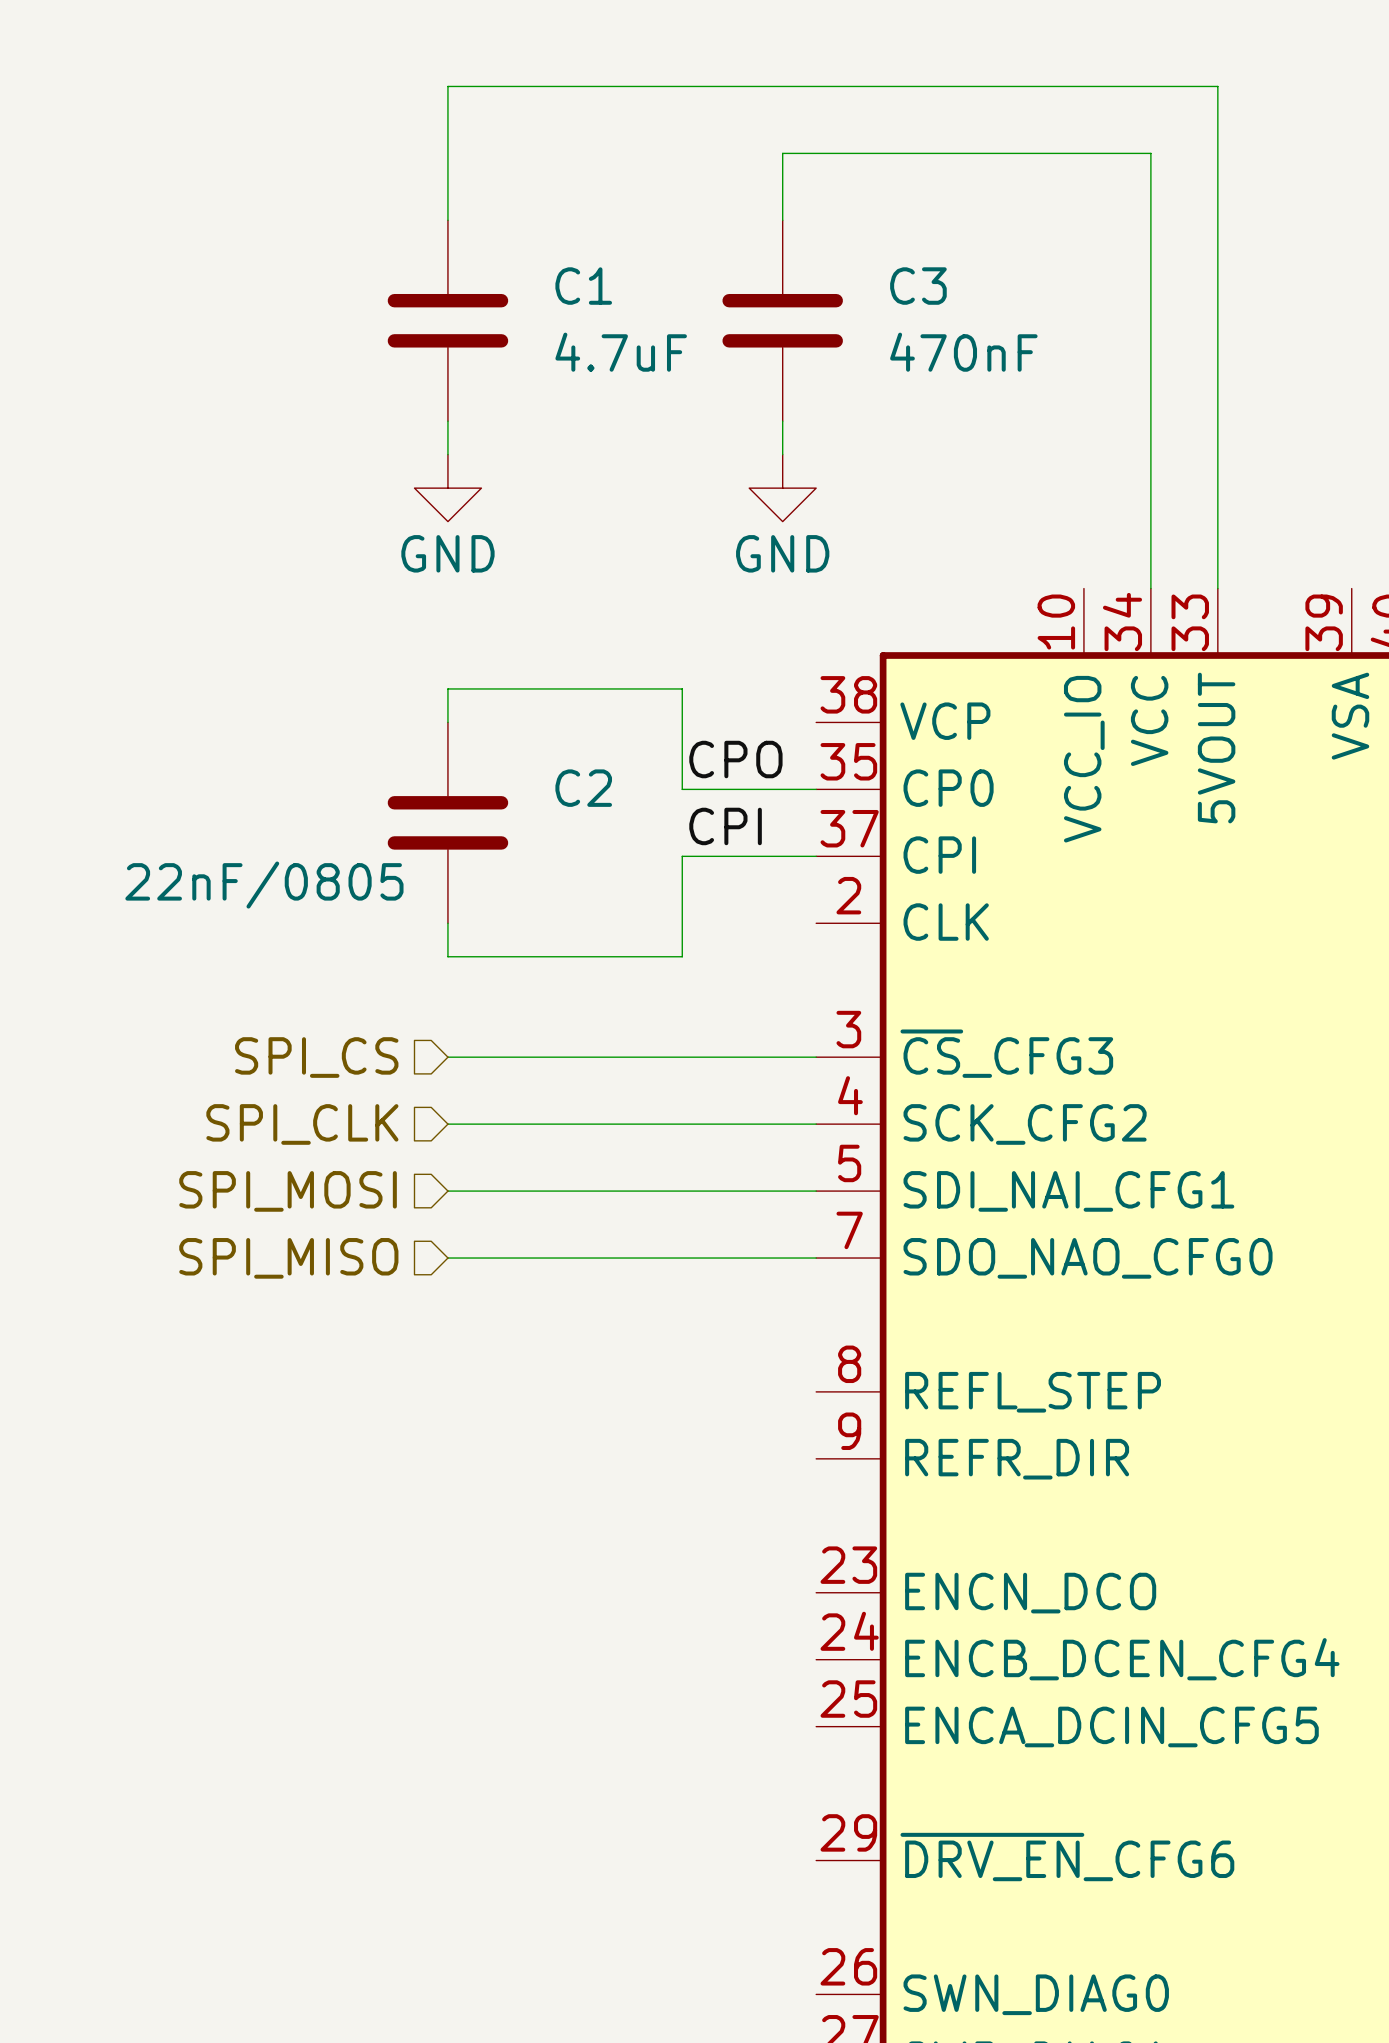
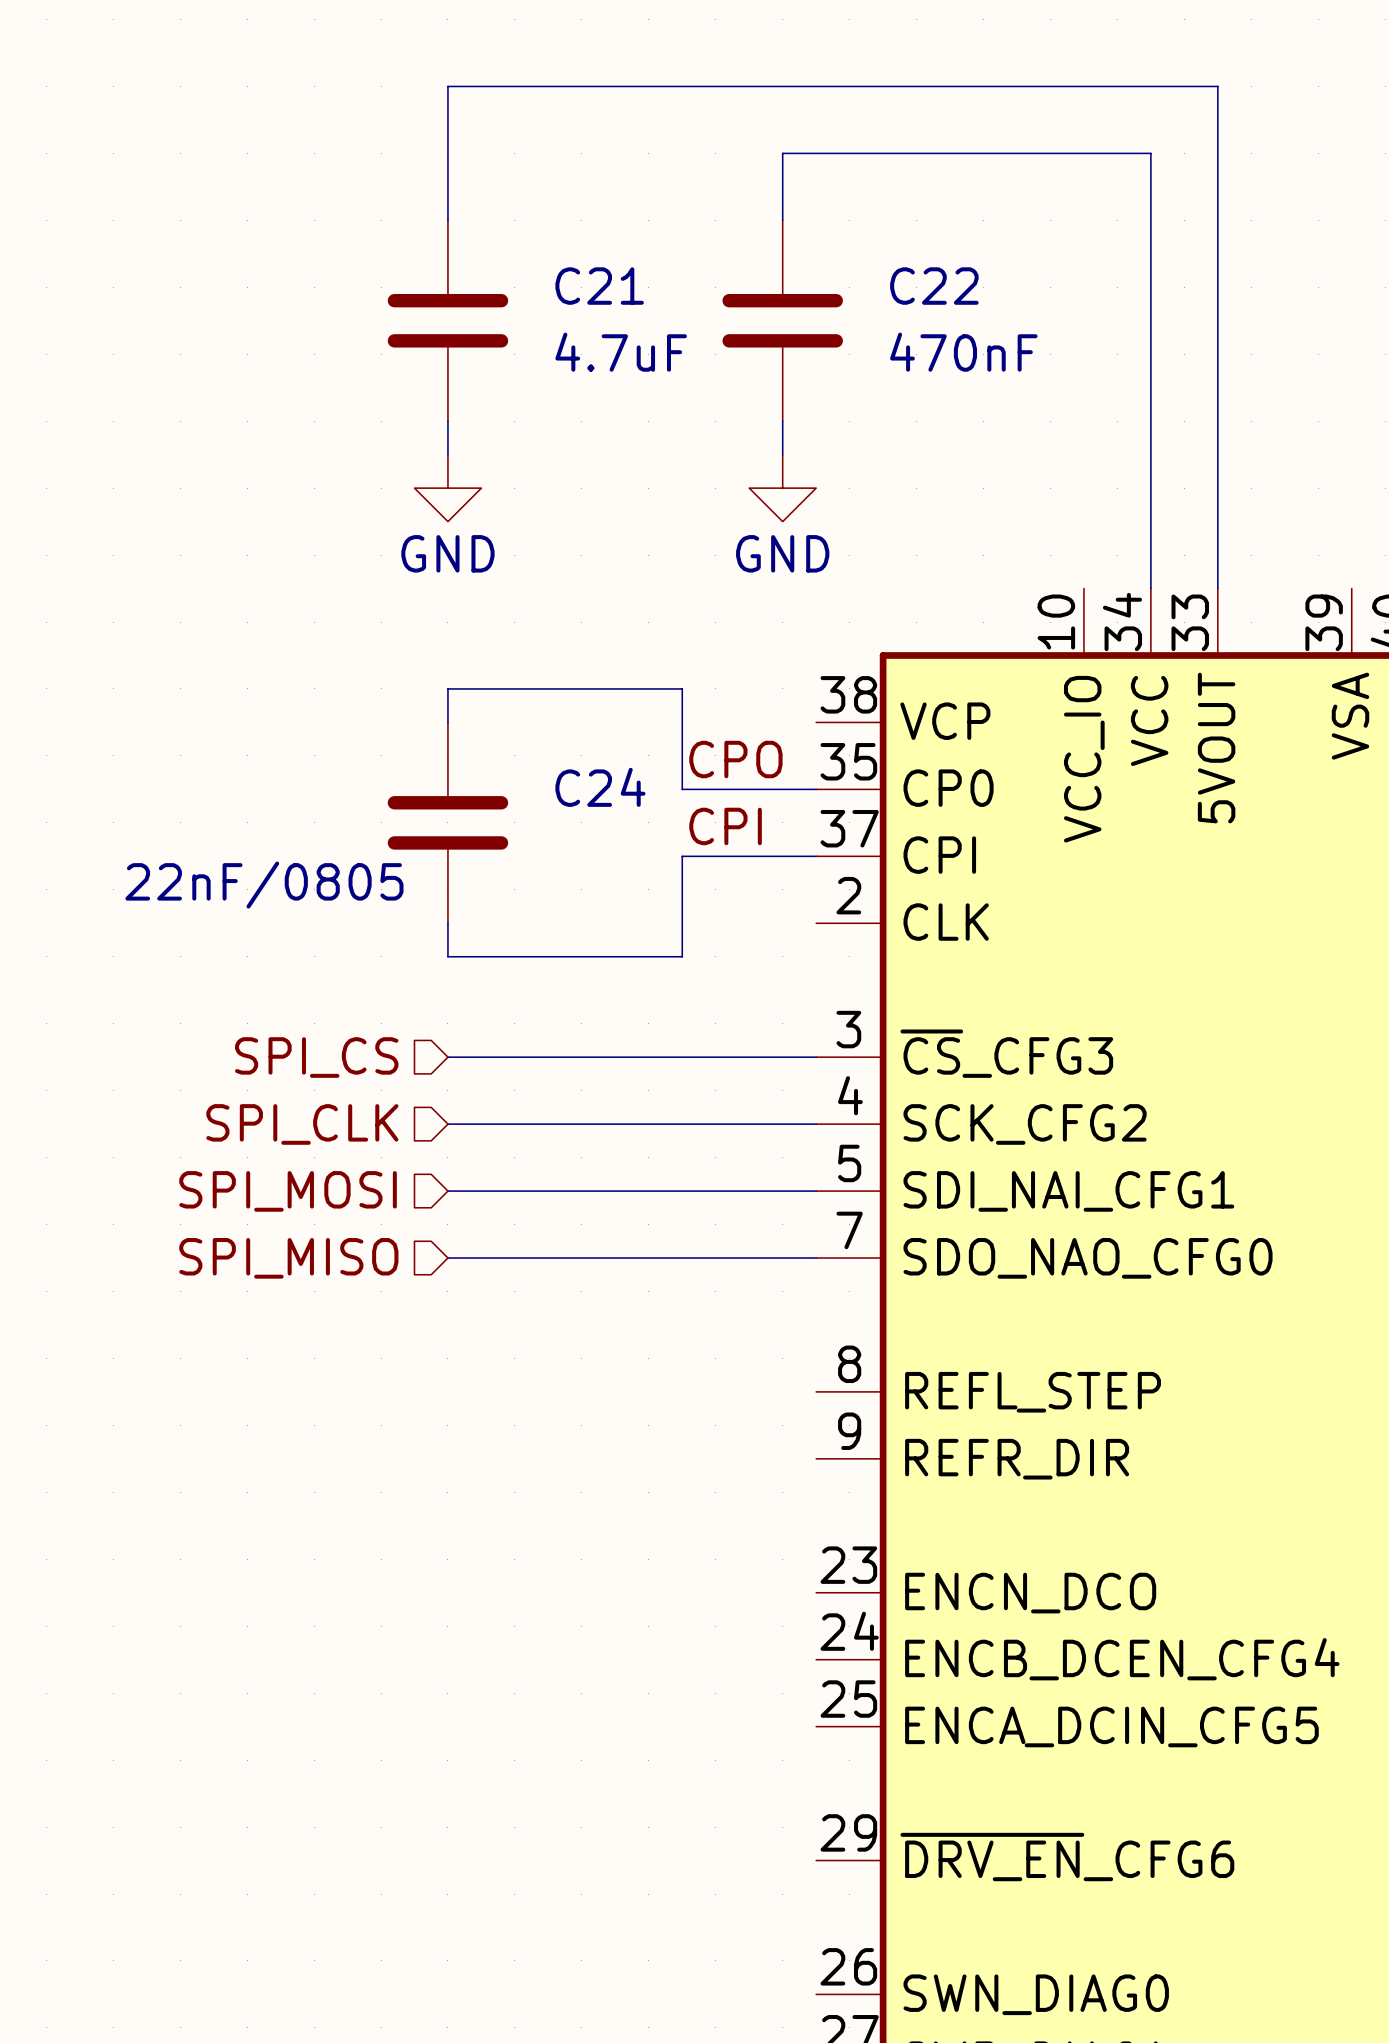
C1 name: C1 (583, 286) -> C21 (599, 286)
C3 name: C3 (918, 286) -> C22 (934, 286)
C2 name: C2 (583, 788) -> C24 (600, 787)

